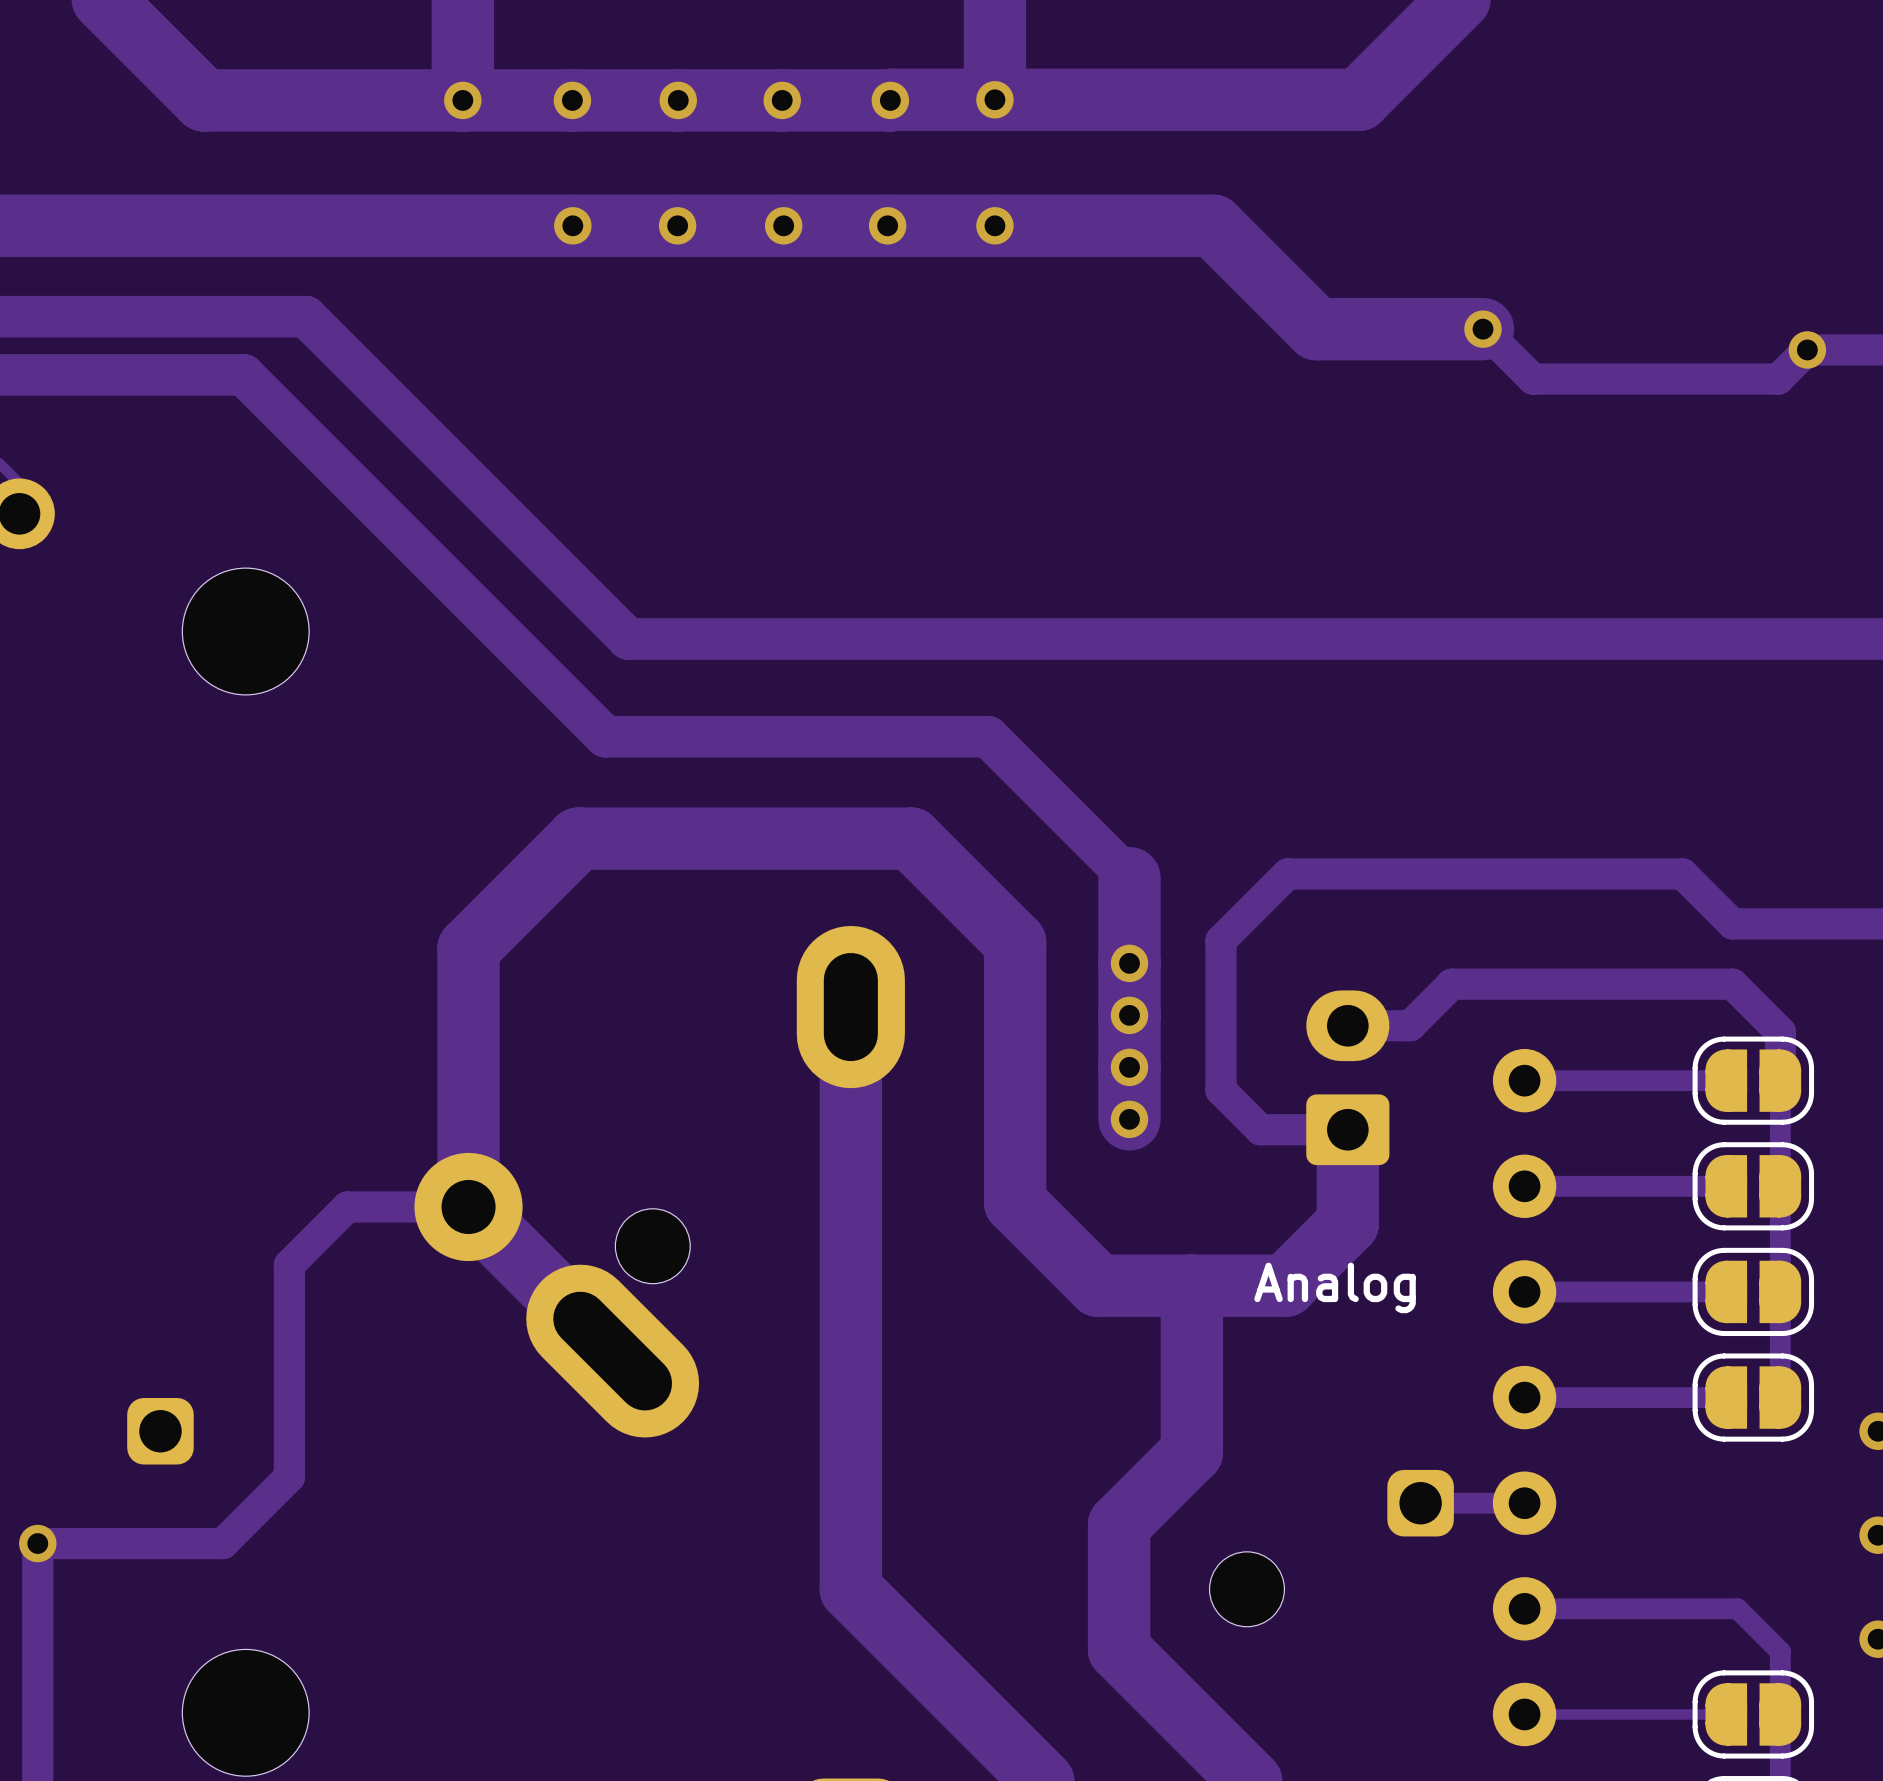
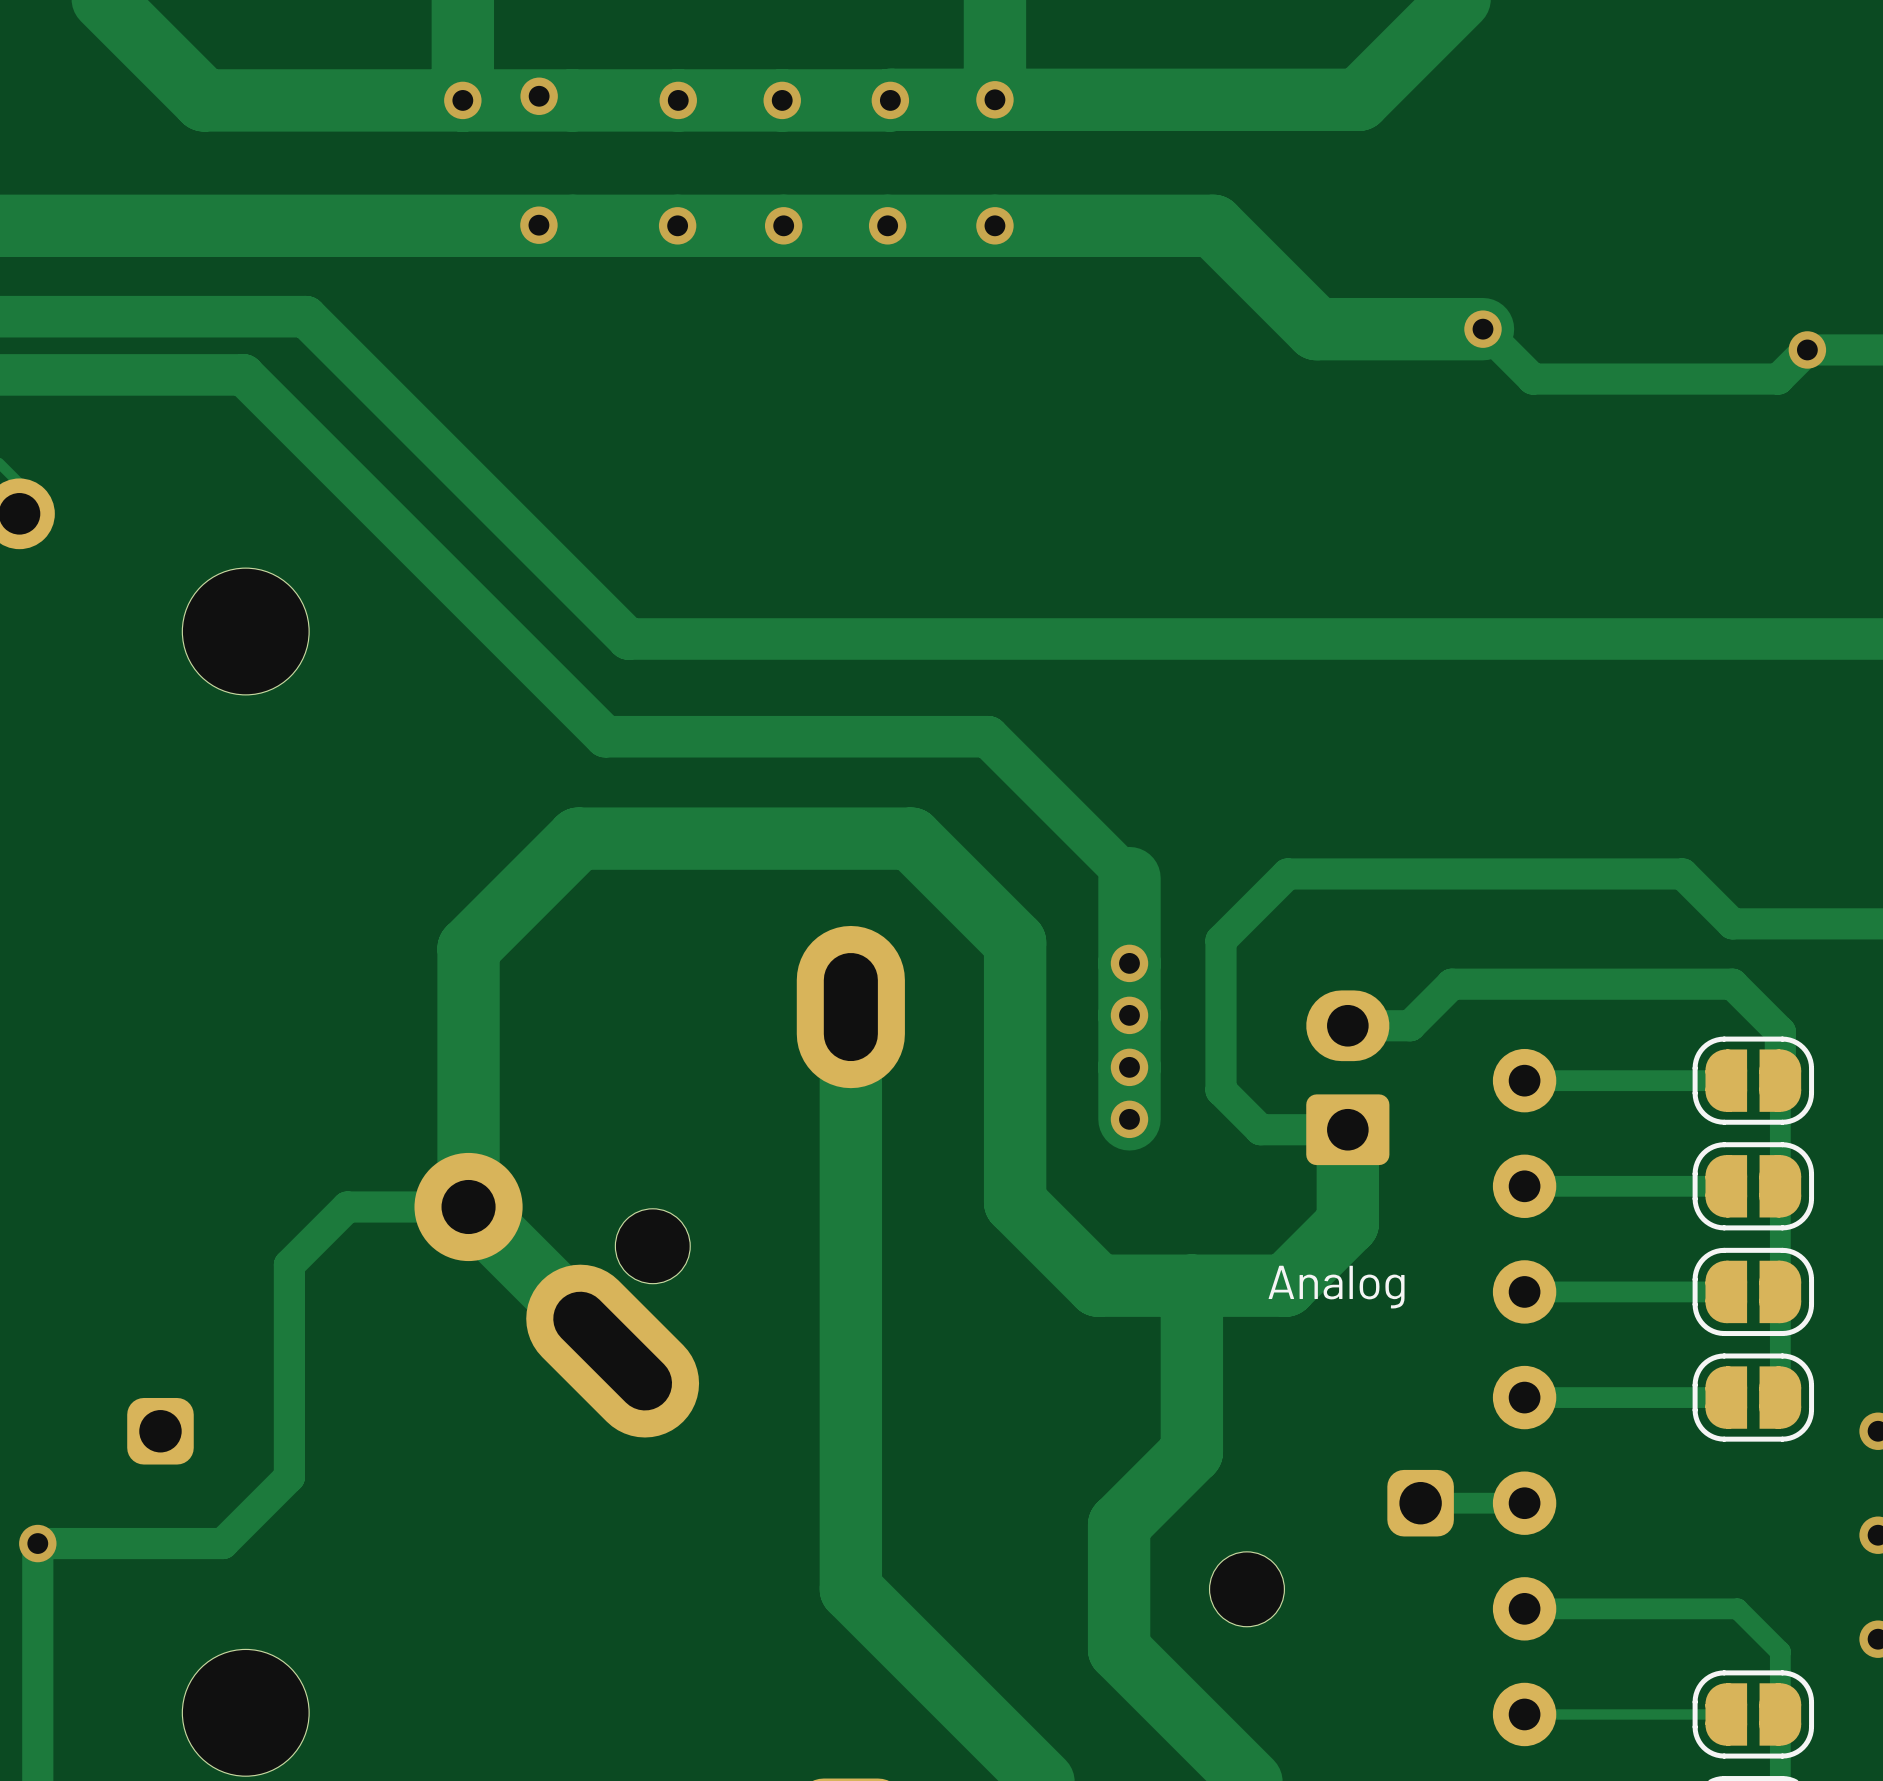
via position: (572, 100) -> (539, 96)
via position: (572, 225) -> (538, 225)

